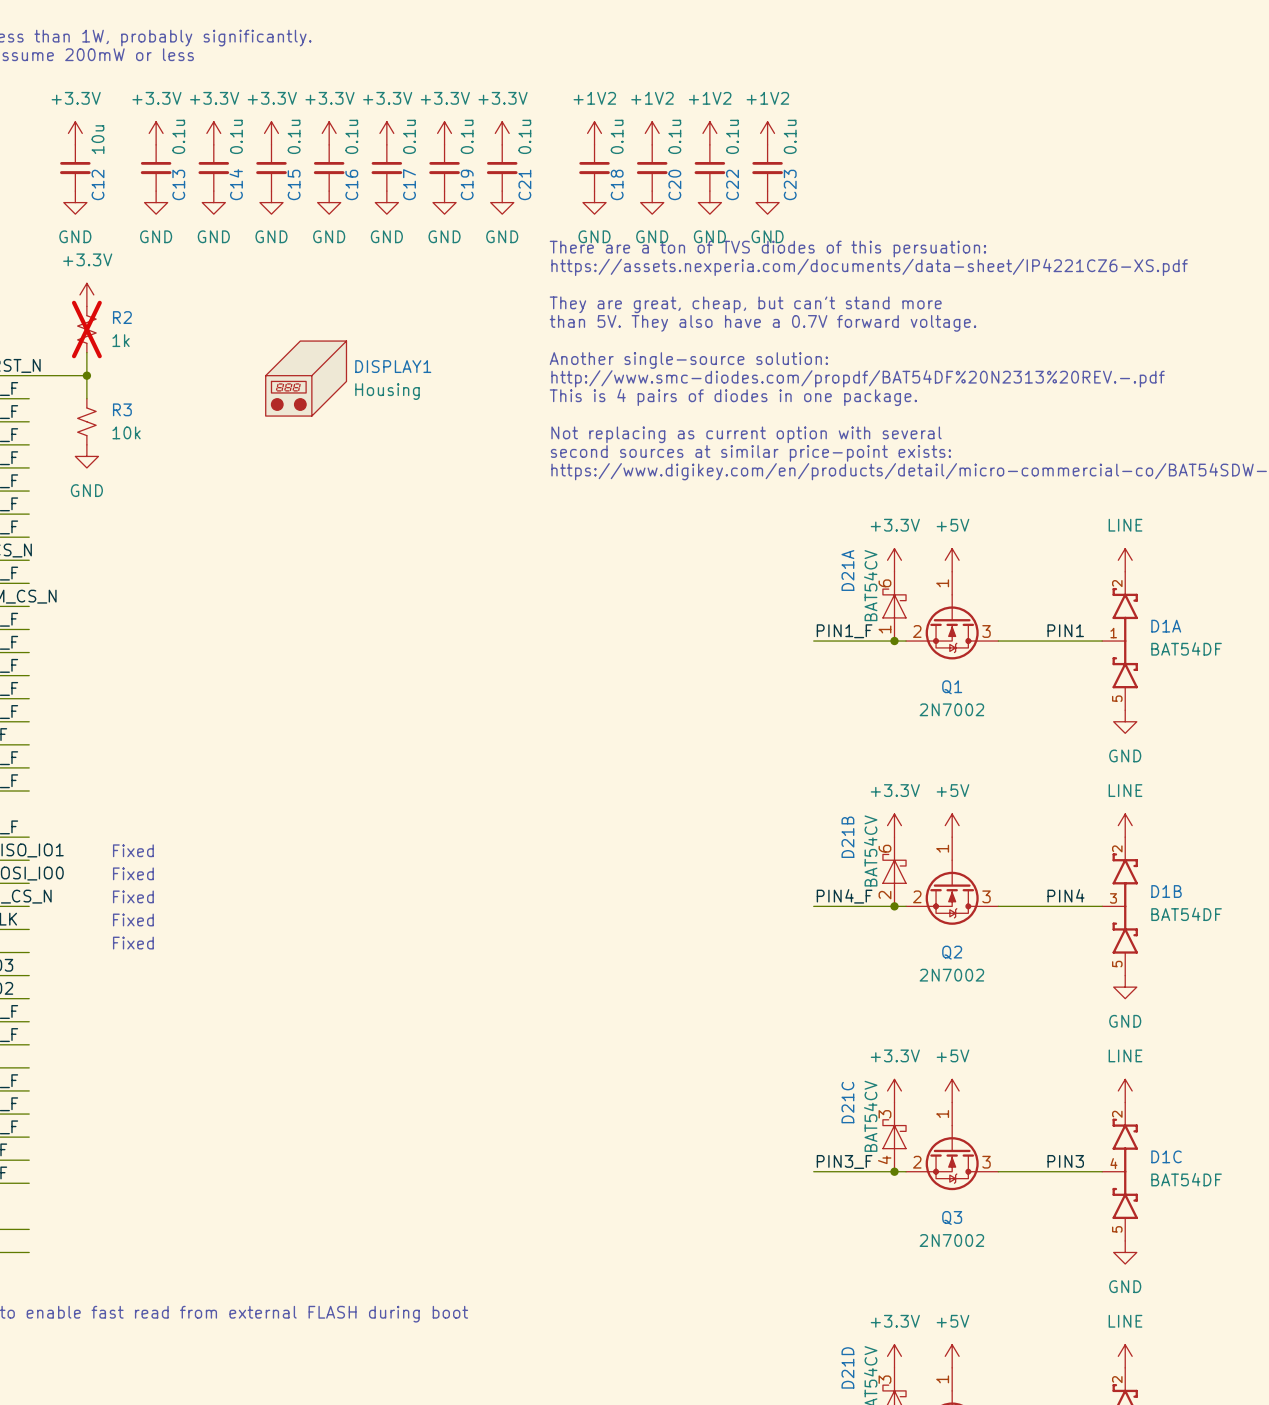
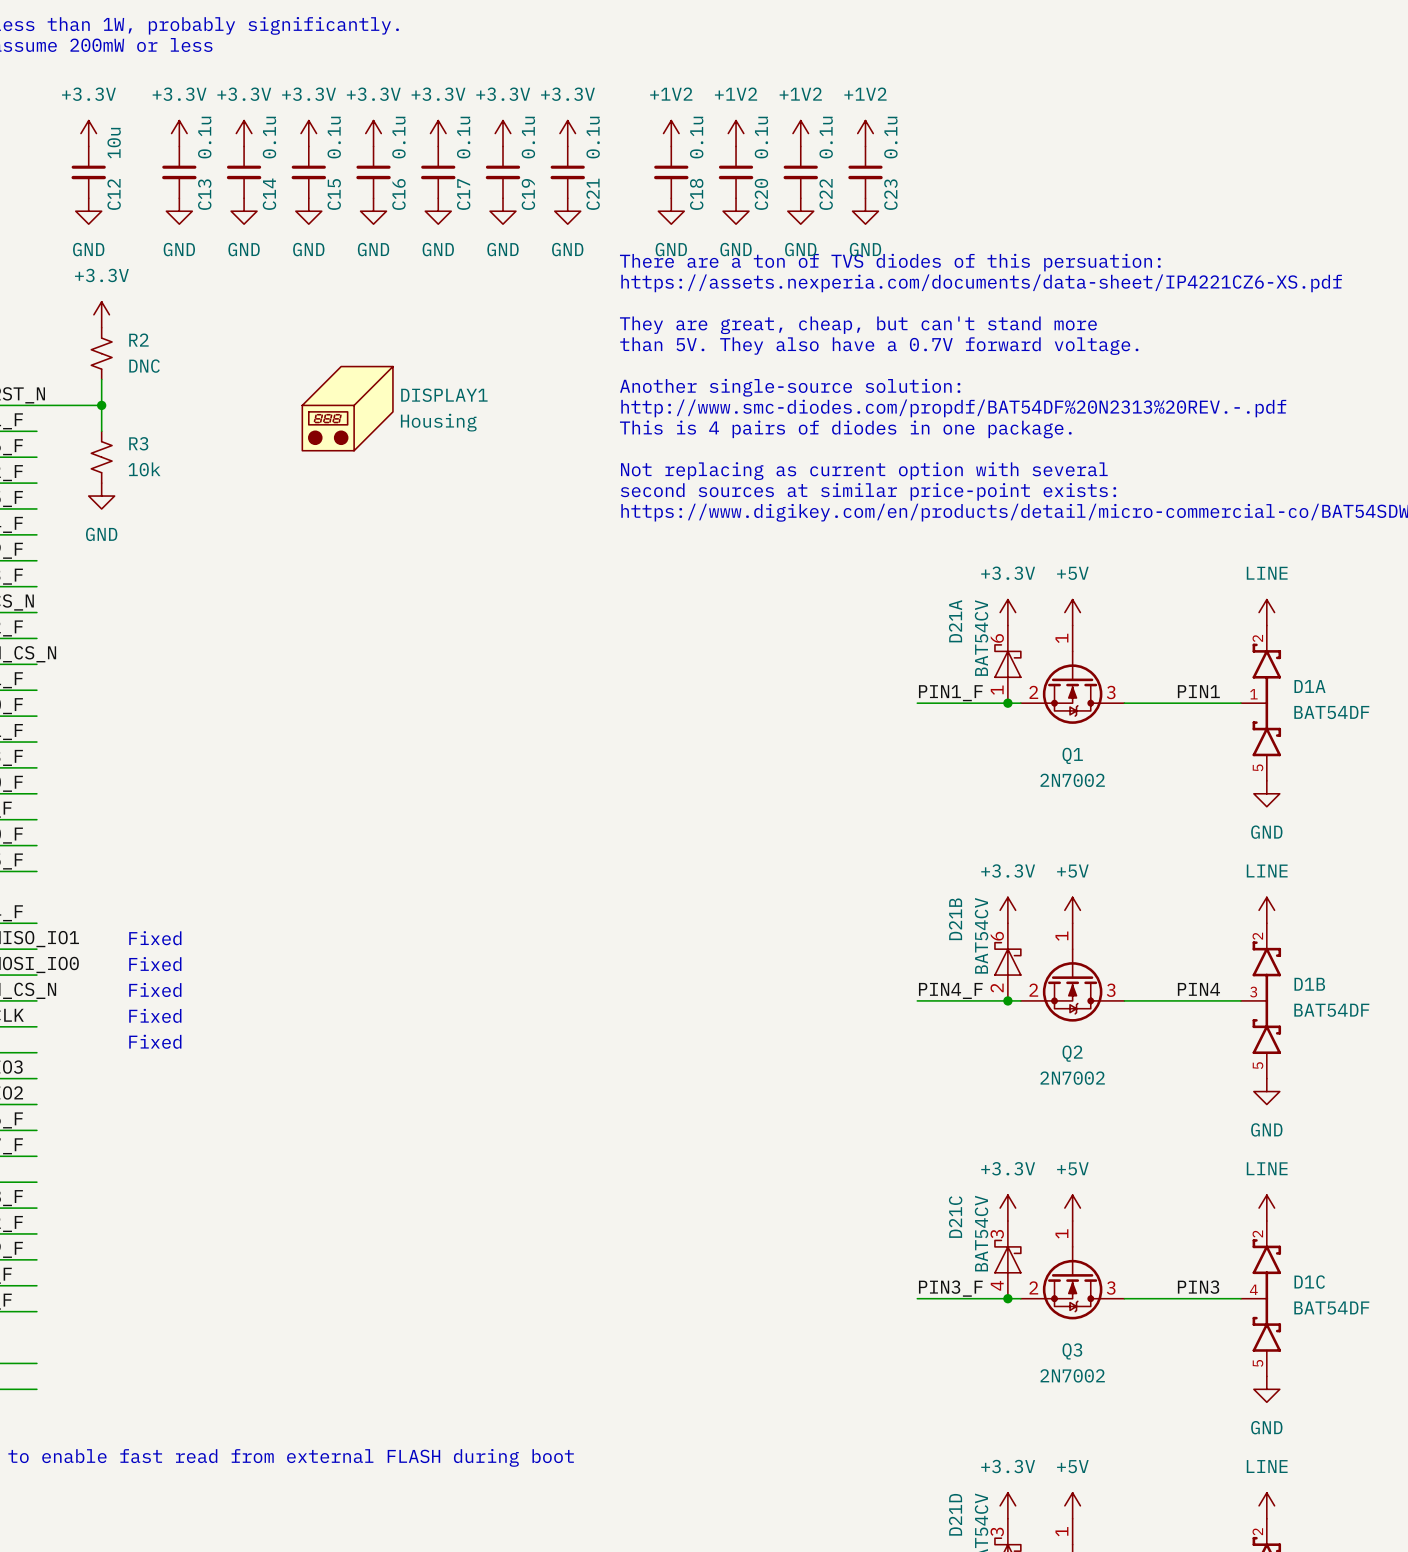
R2 do-not-place cross: (86, 329) -> none
R2 value: 1k (121, 340) -> DNC (144, 366)

